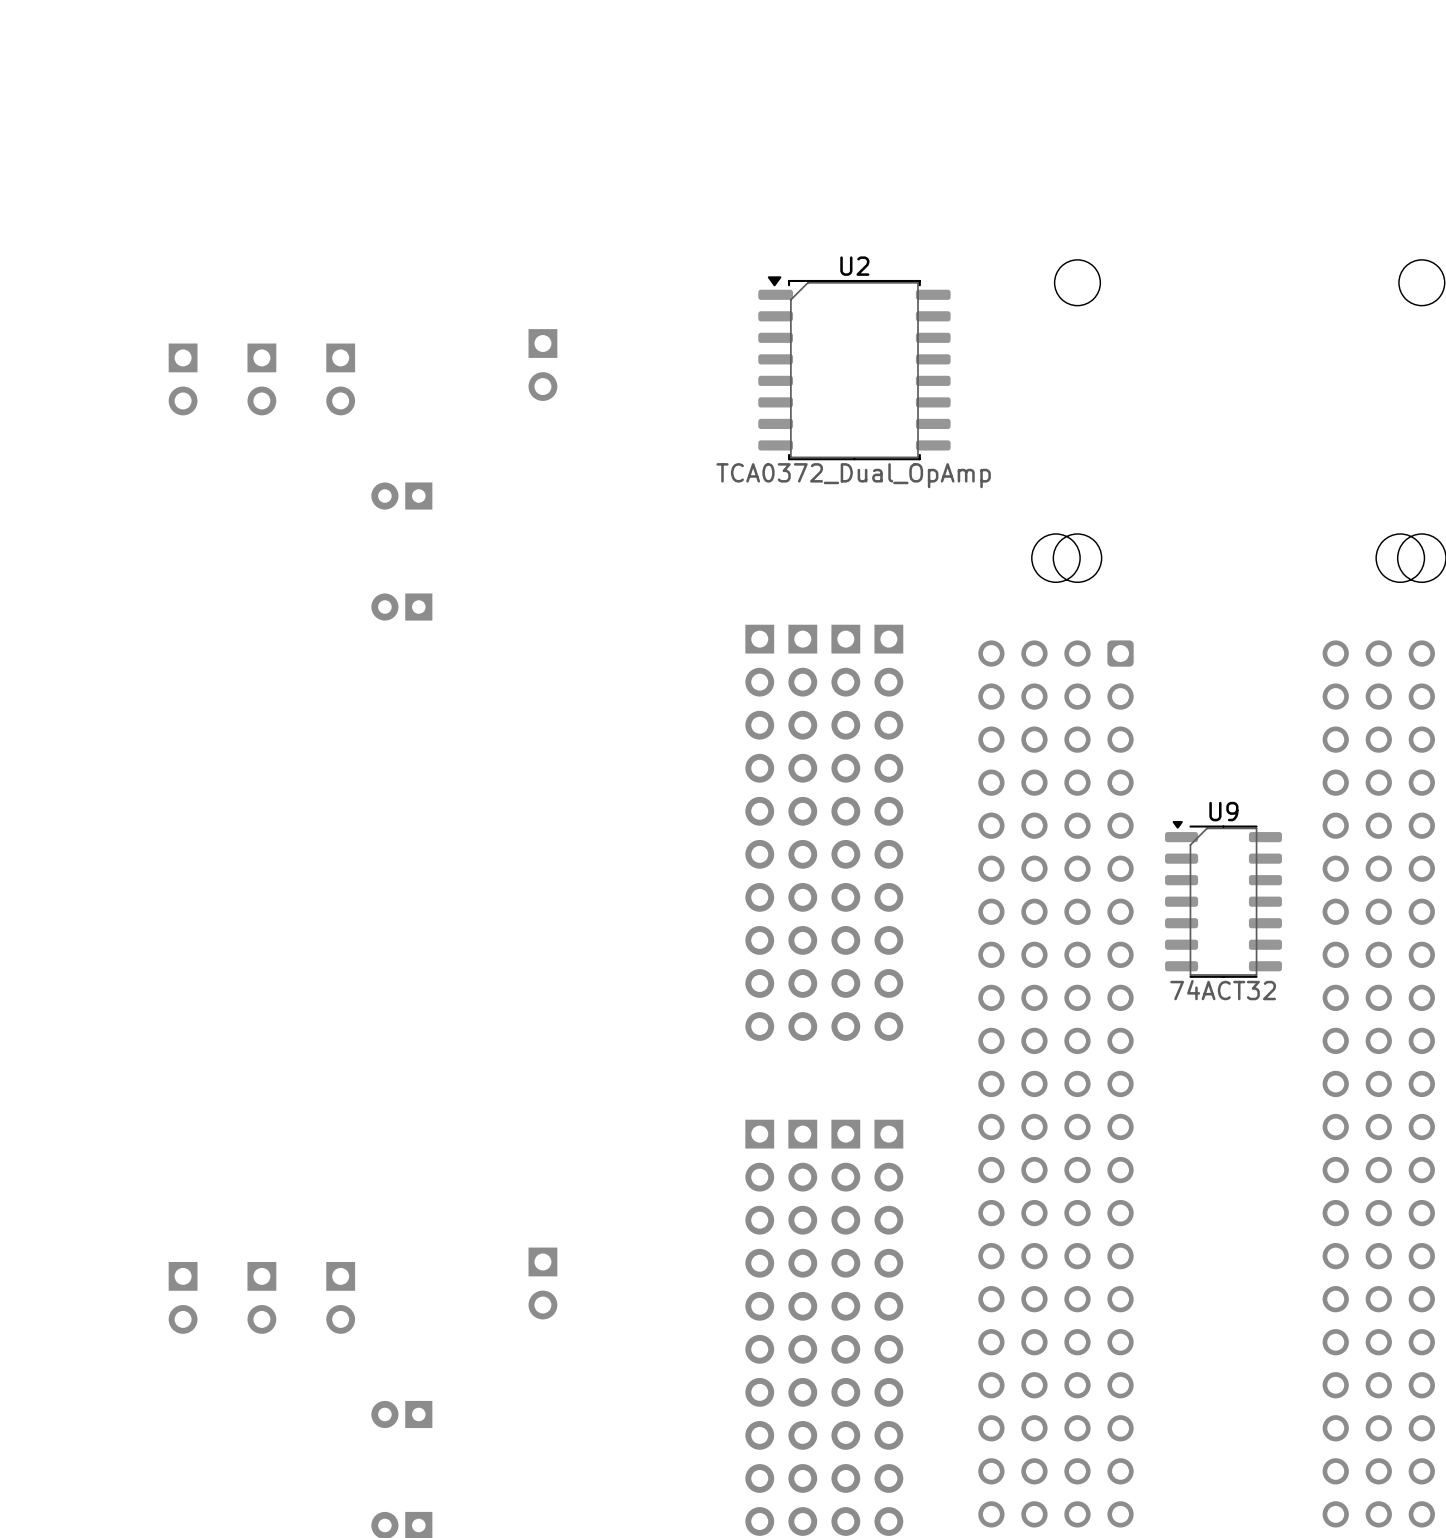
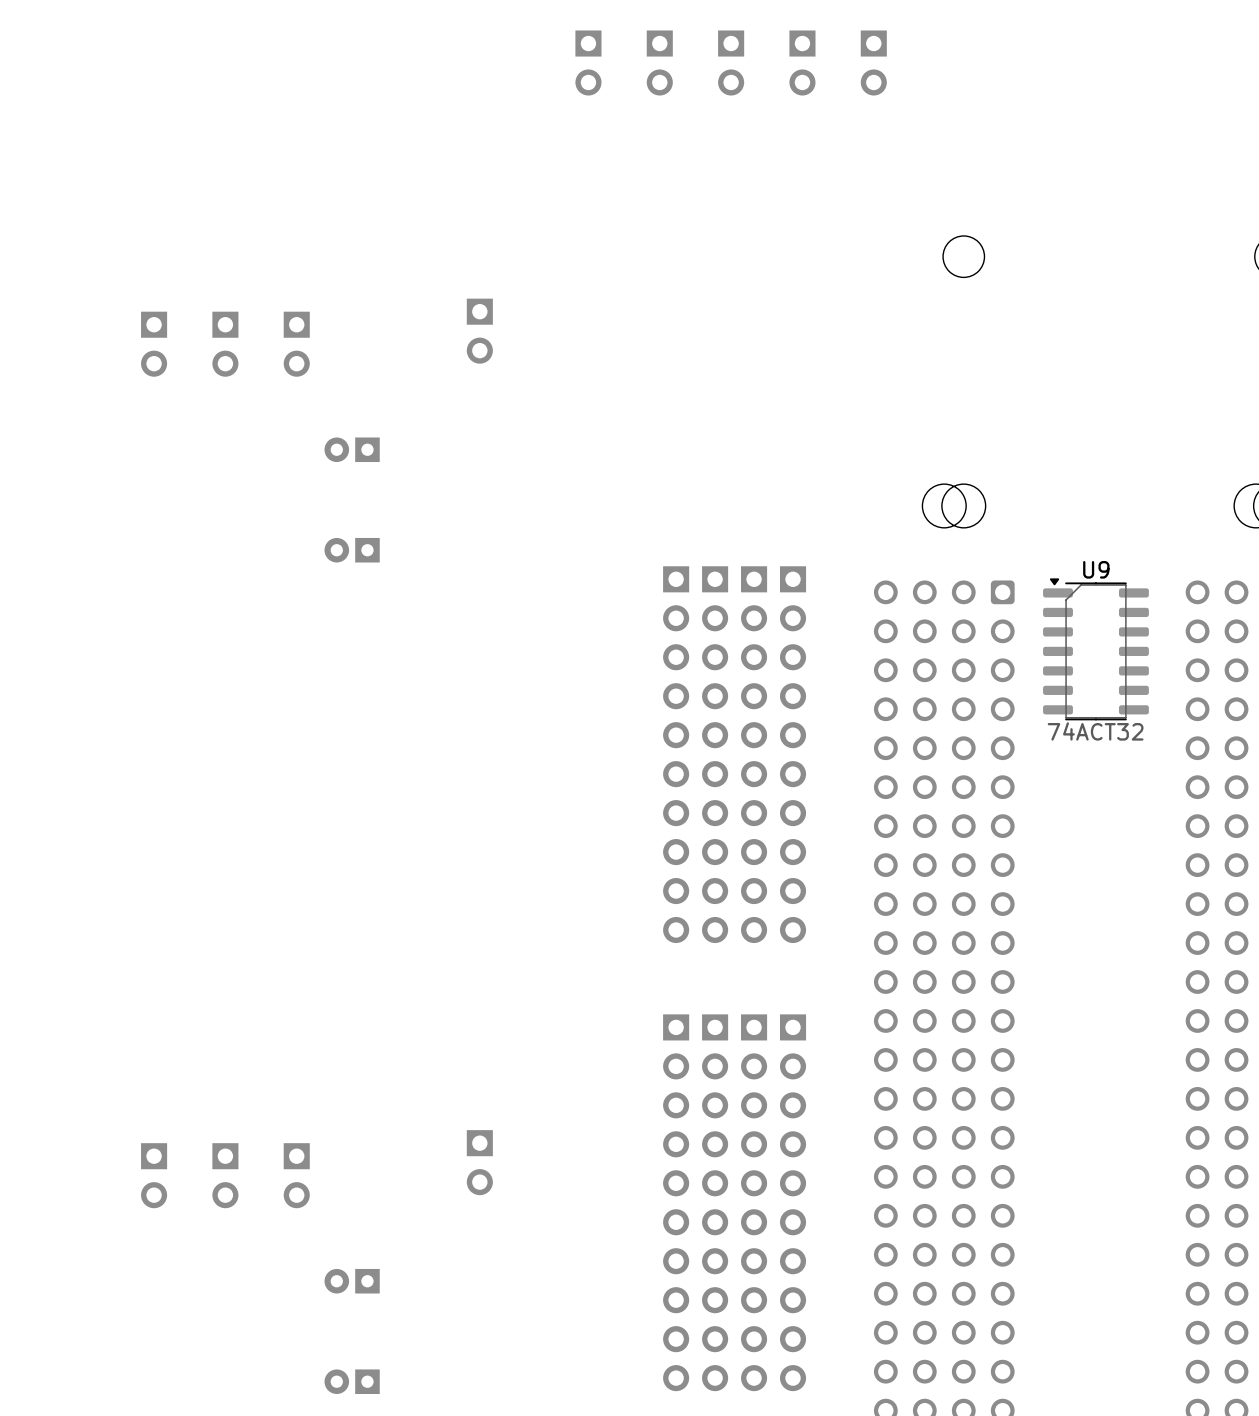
part: none -> (588, 63)
part: none -> (659, 63)
part: none -> (731, 63)
part: none -> (802, 63)
part: none -> (873, 63)
U2: TCA0372_Dual_OpAmp (854, 368) -> none
U9 position: (1223, 899) -> (1095, 649)

